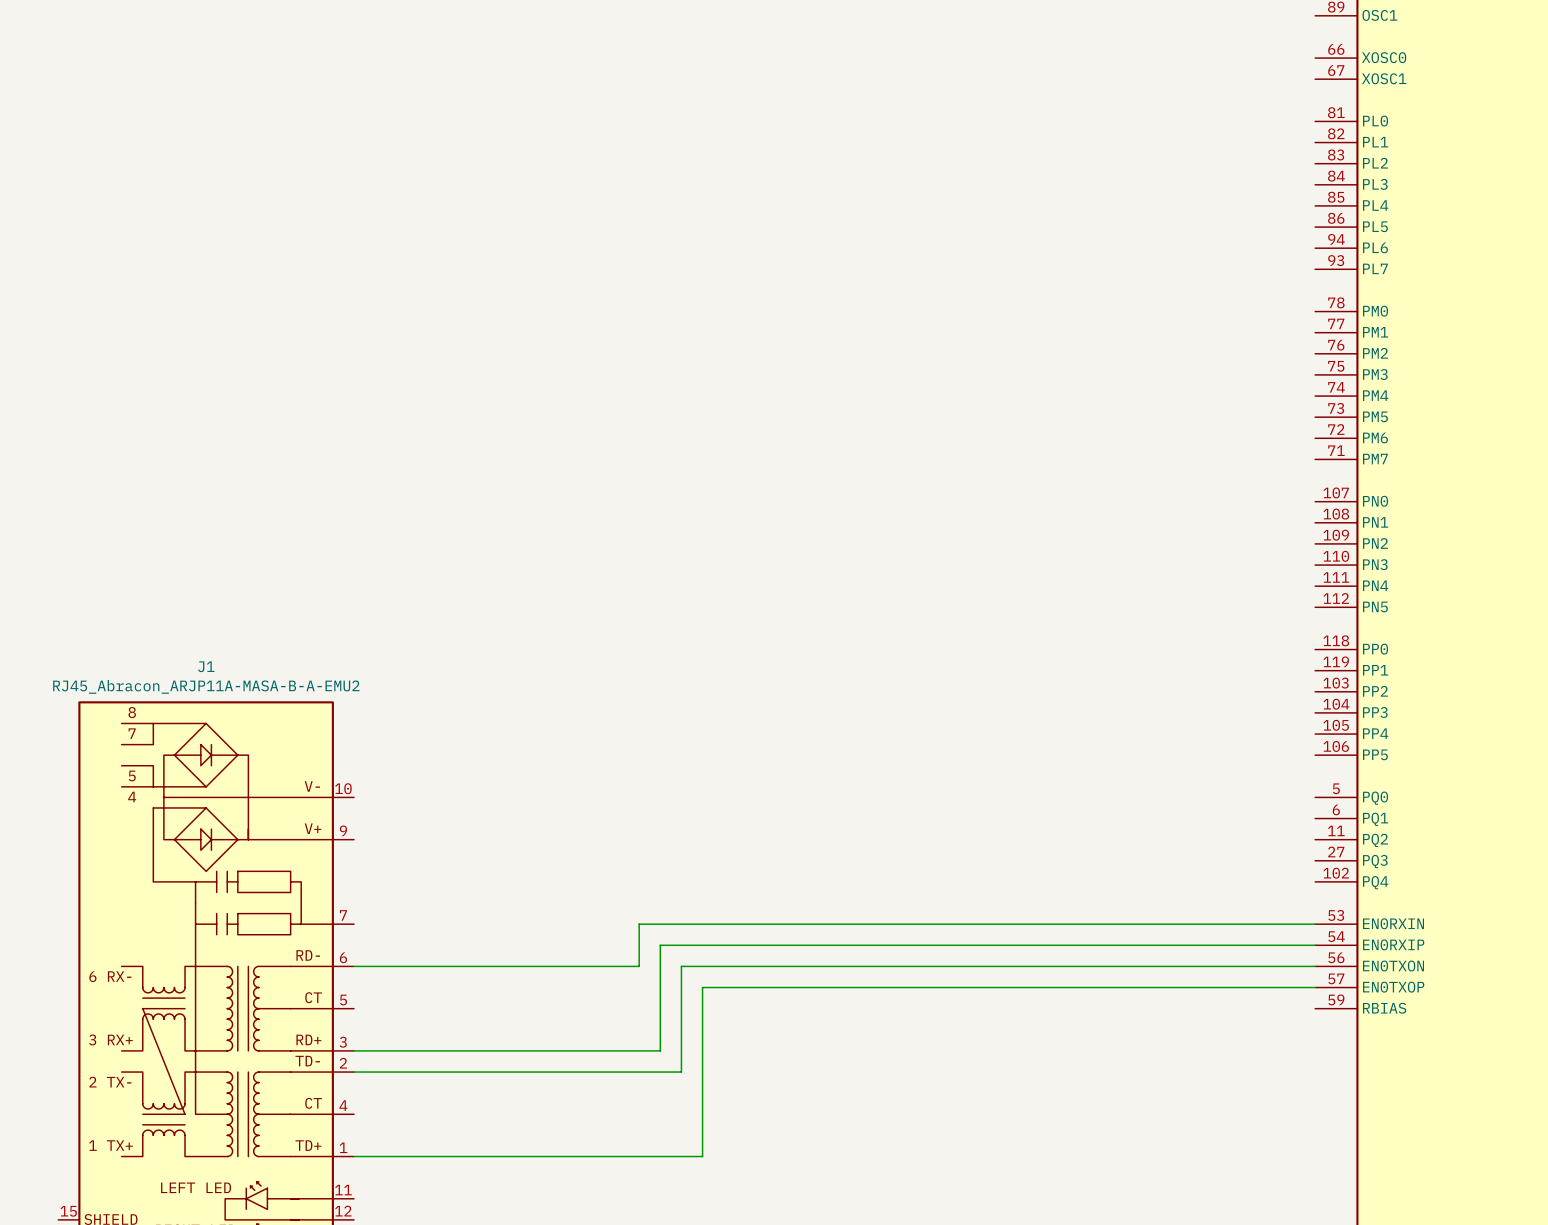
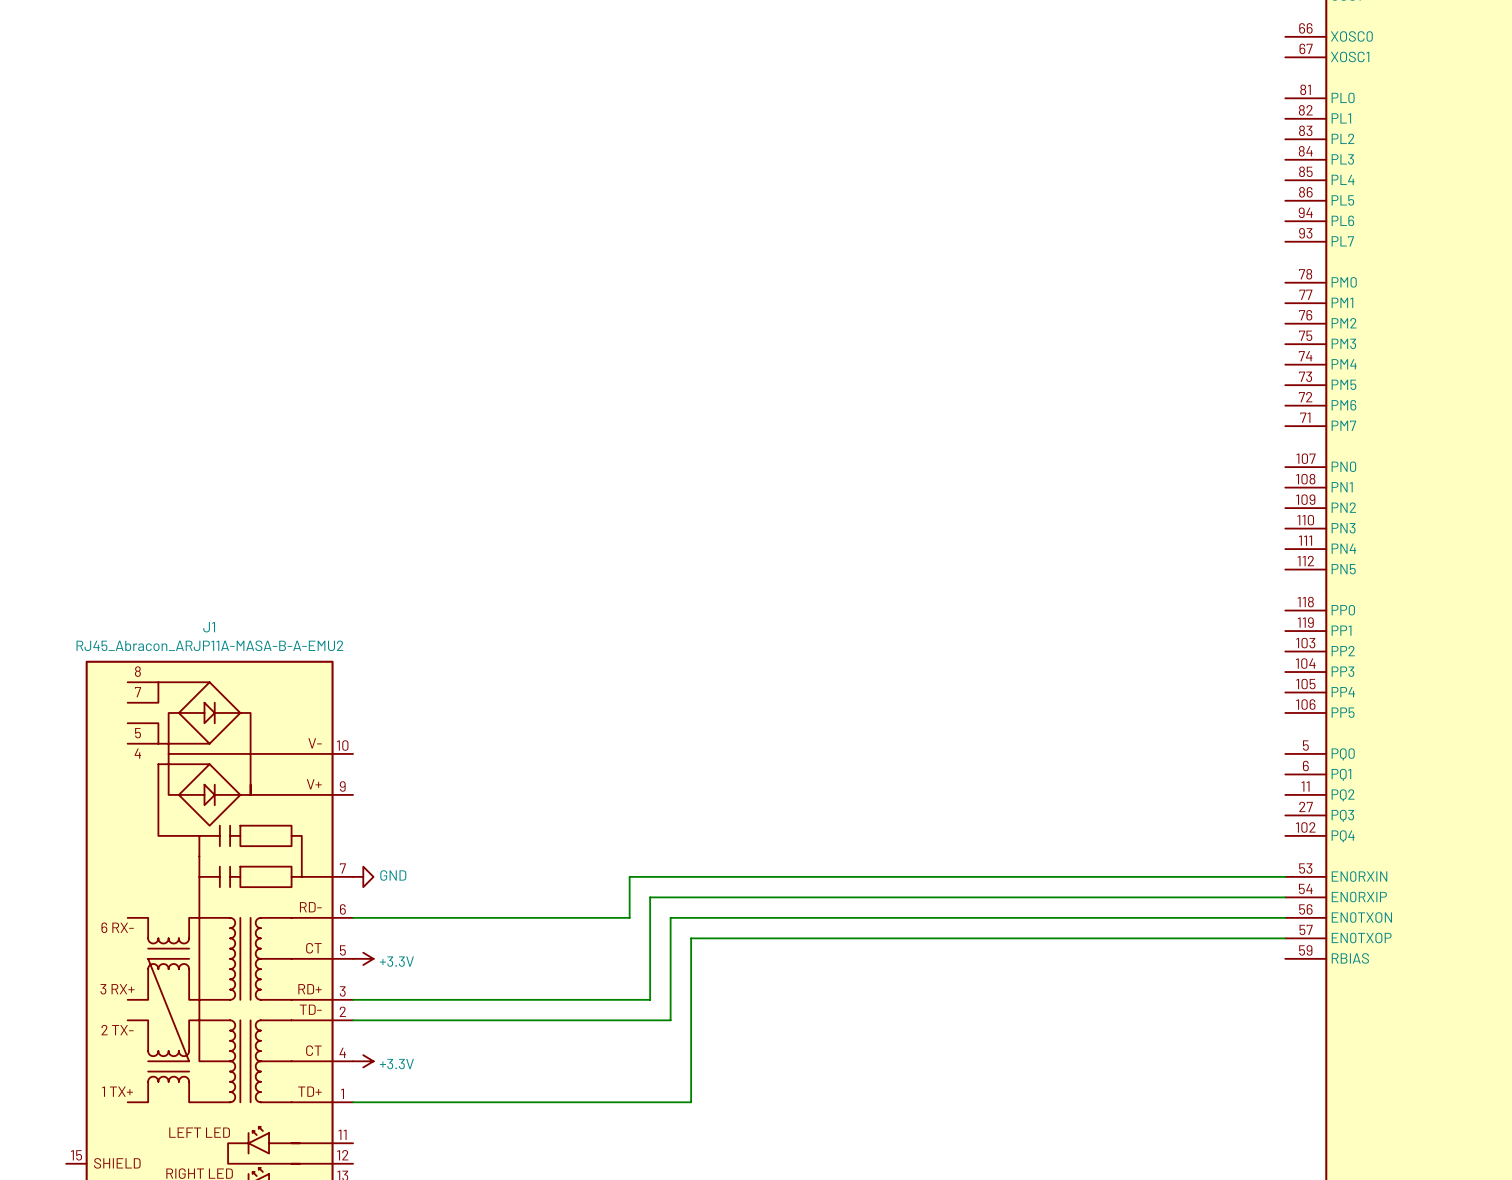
power symbol: none -> GND (363, 876)
power symbol: none -> +3.3V (363, 958)
power symbol: none -> +3.3V (363, 1061)

